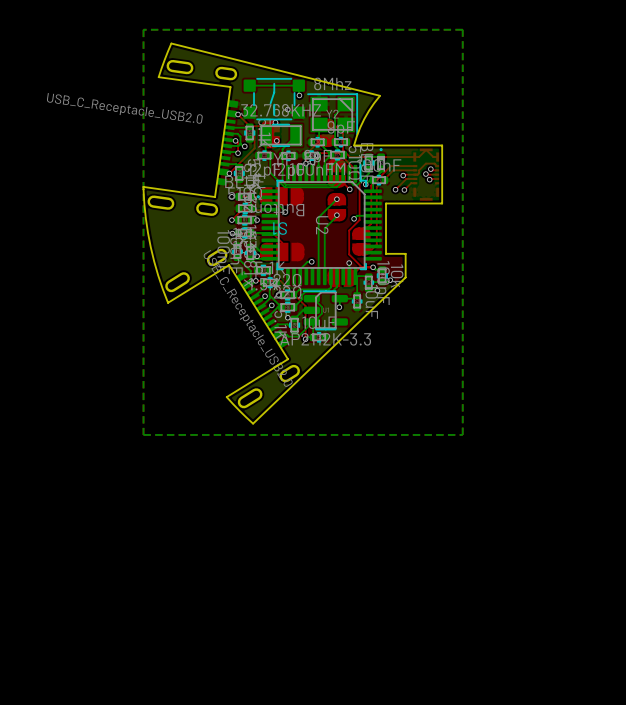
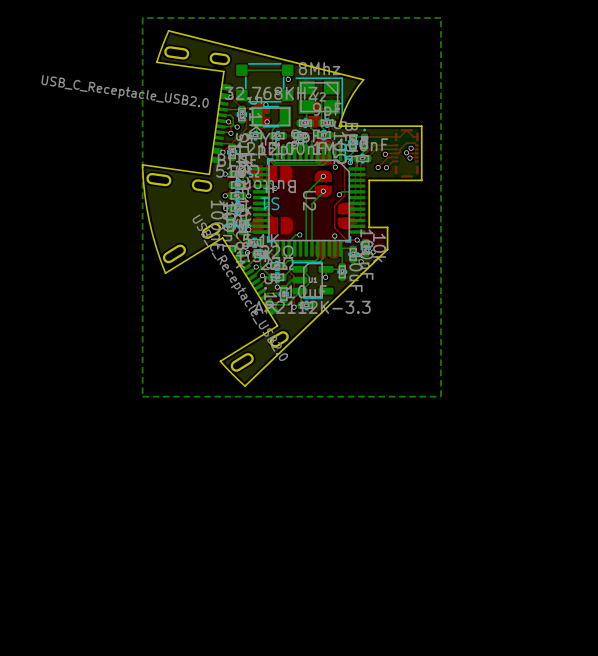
line: (274, 83) (274, 92) (270, 103) -> none
line: (274, 104) (274, 115) -> none

